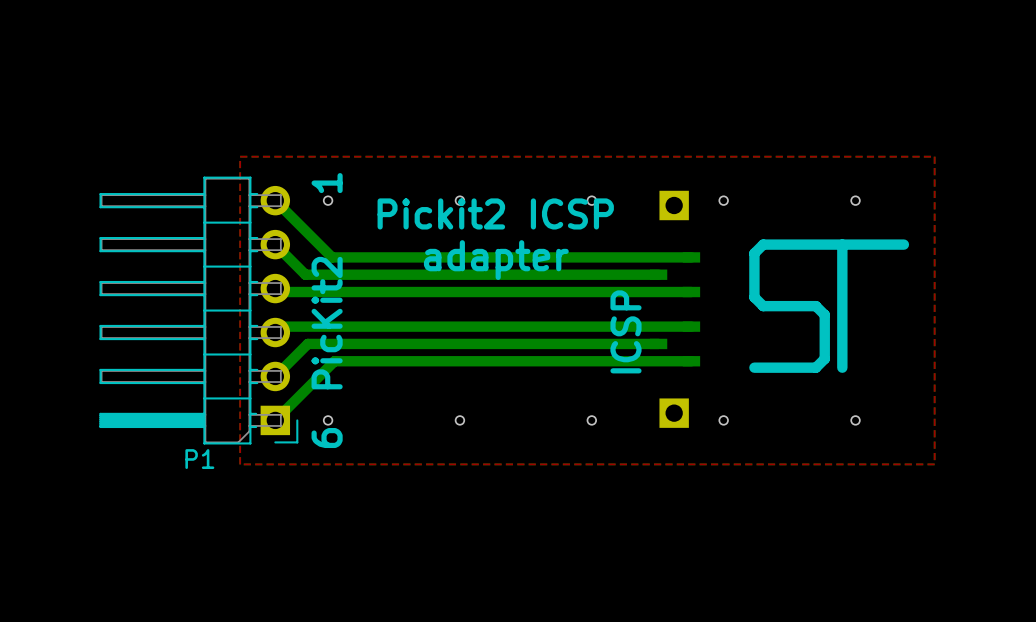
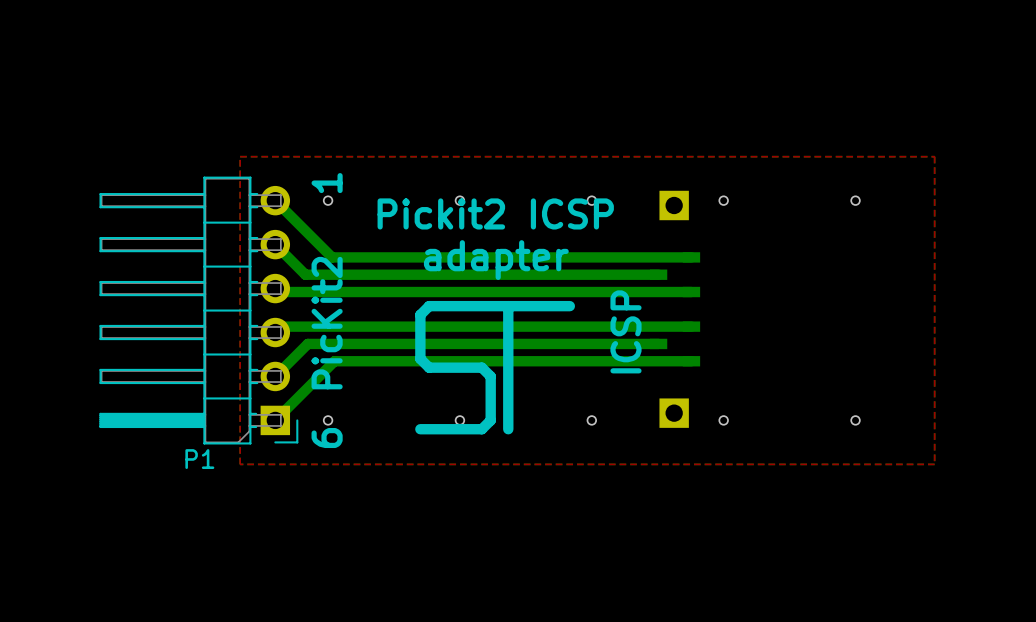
line: (842, 244) (842, 367) -> (508, 306) (508, 429)
line: (903, 244) (763, 244) (754, 253) (754, 297) (763, 306) (815, 306) (824, 314) (824, 358) (815, 367) (754, 367) -> (569, 306) (429, 306) (420, 314) (420, 358) (429, 367) (481, 367) (490, 376) (490, 420) (481, 429) (420, 429)

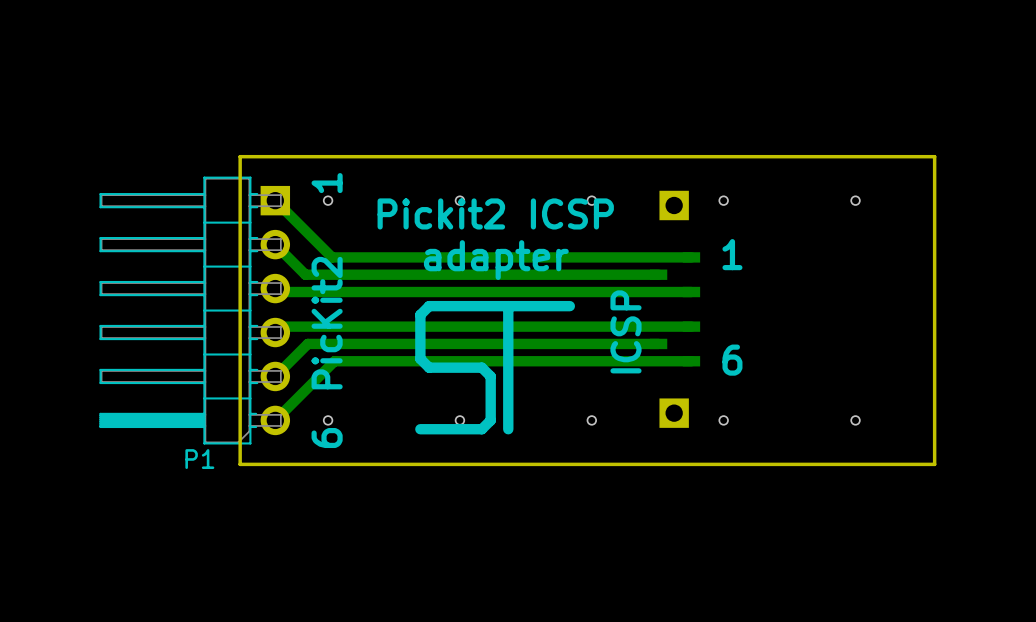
board edge: none -> (240, 156) (240, 464) (934, 464) (934, 156) (240, 156)
P1 footprint: [99, 176, 299, 445] -> [99, 176, 291, 445]
text: none -> 1 (732, 254)
text: none -> 6 (732, 360)

